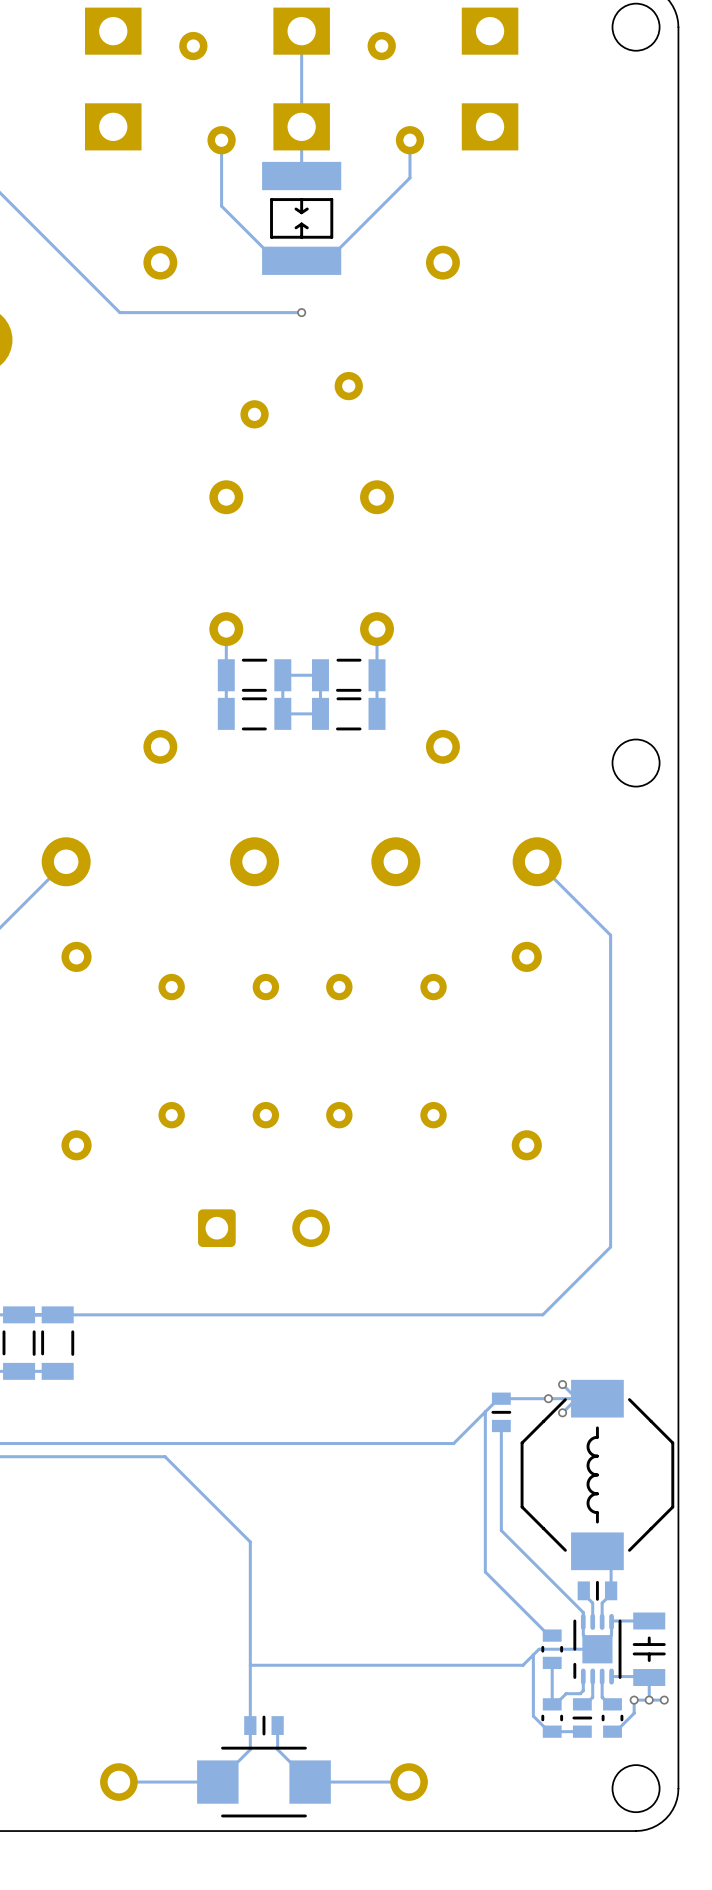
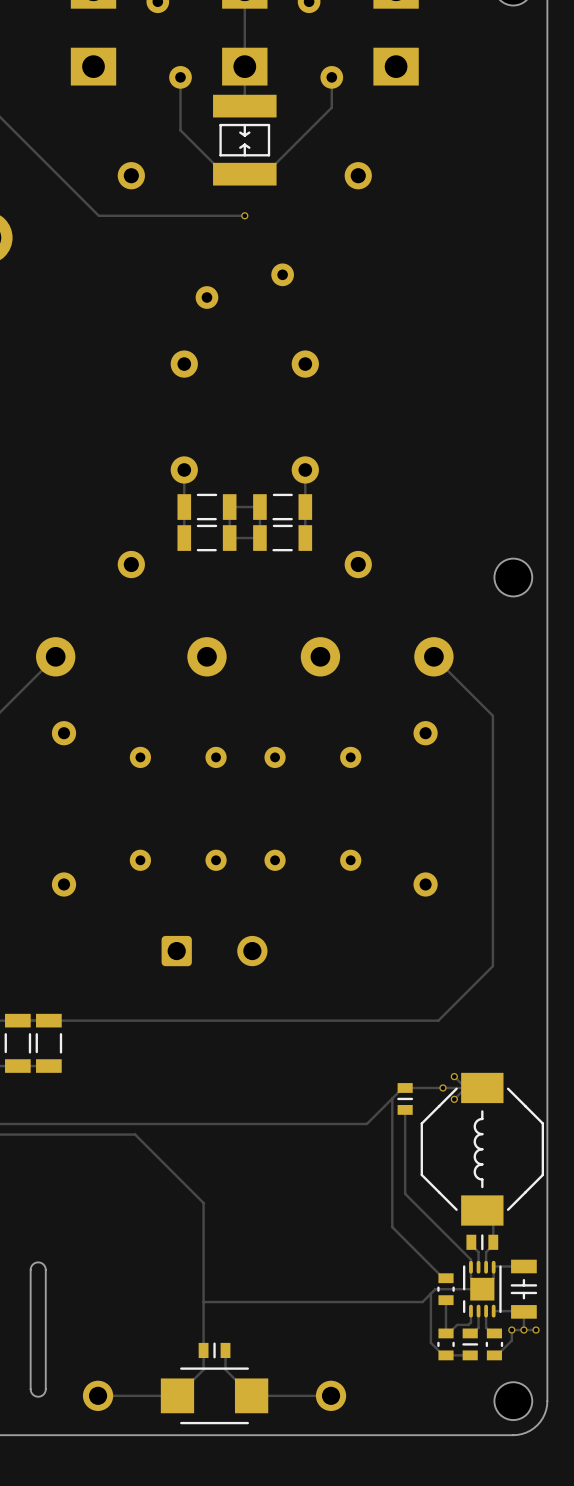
board edge: none -> (45, 1269) (45, 1389) (43, 1394) (38, 1396) (32, 1394) (30, 1389) (30, 1269) (32, 1264) (38, 1262) (43, 1264) (45, 1269)

